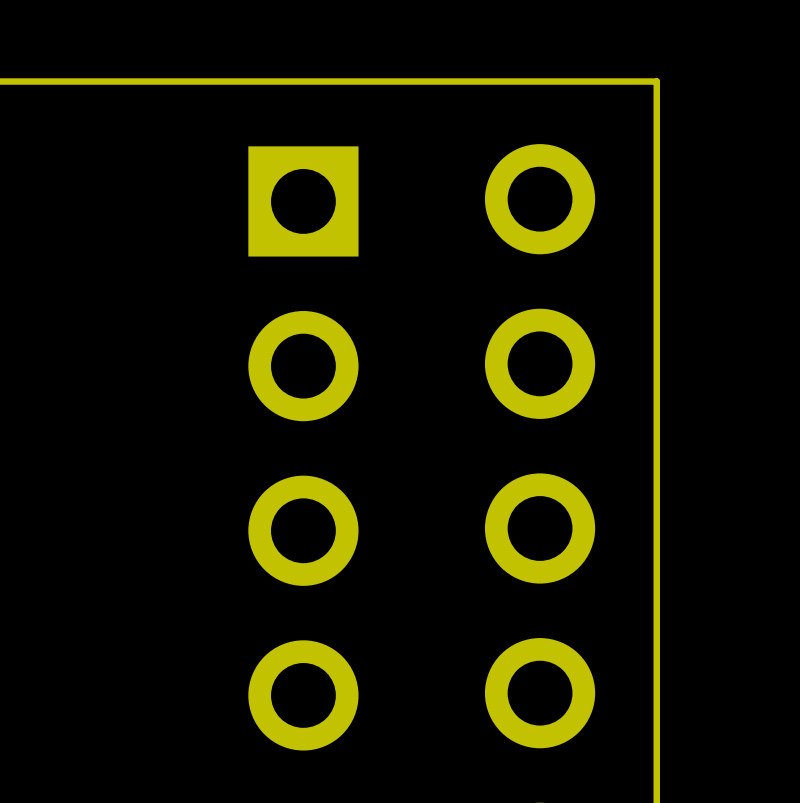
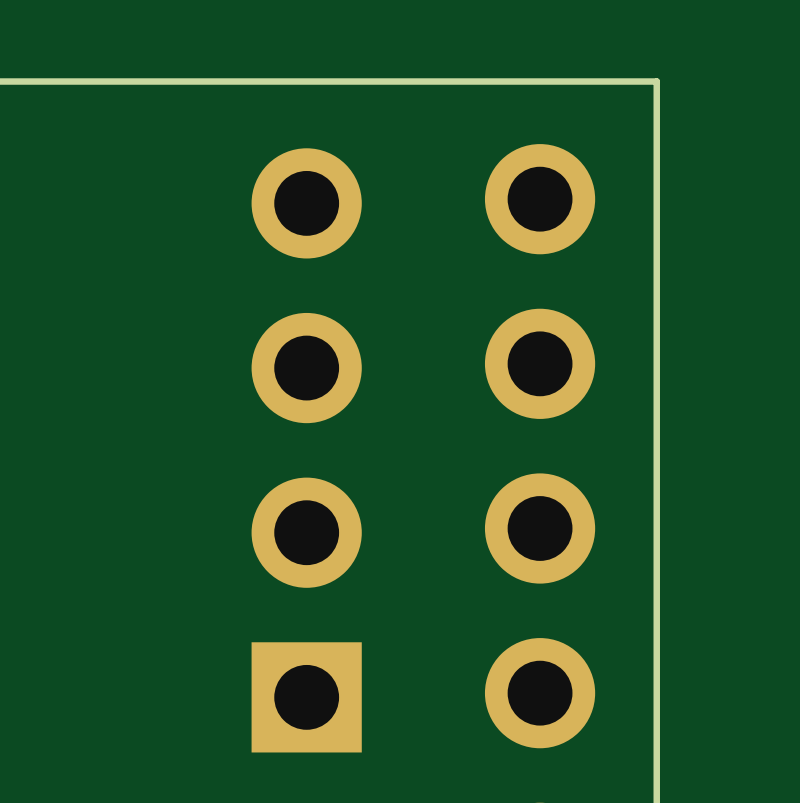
part rotation: 0° (303, 448) -> 180° (306, 450)

